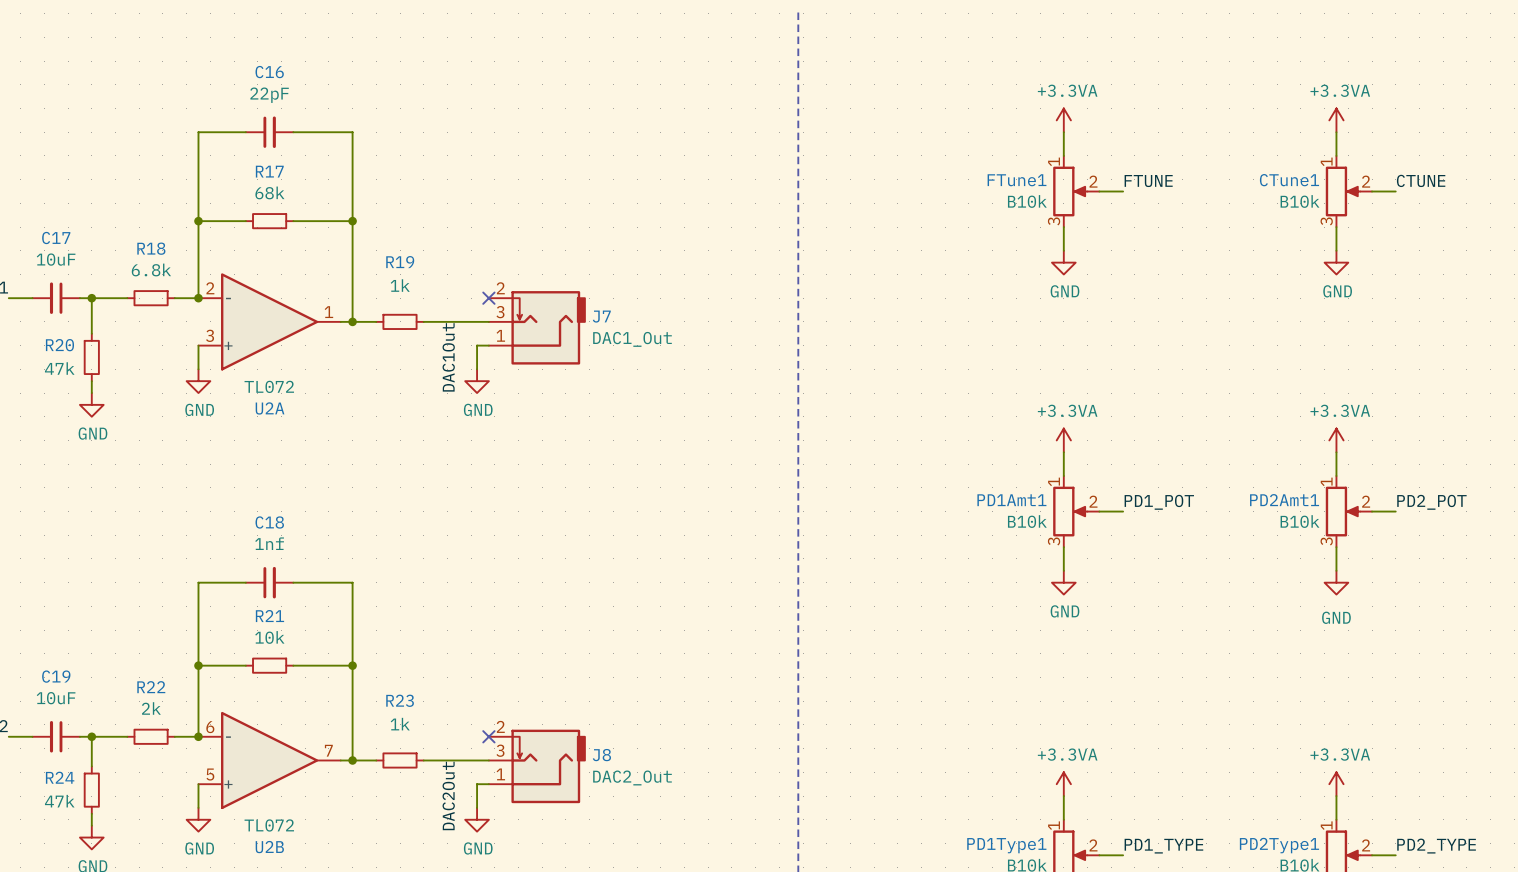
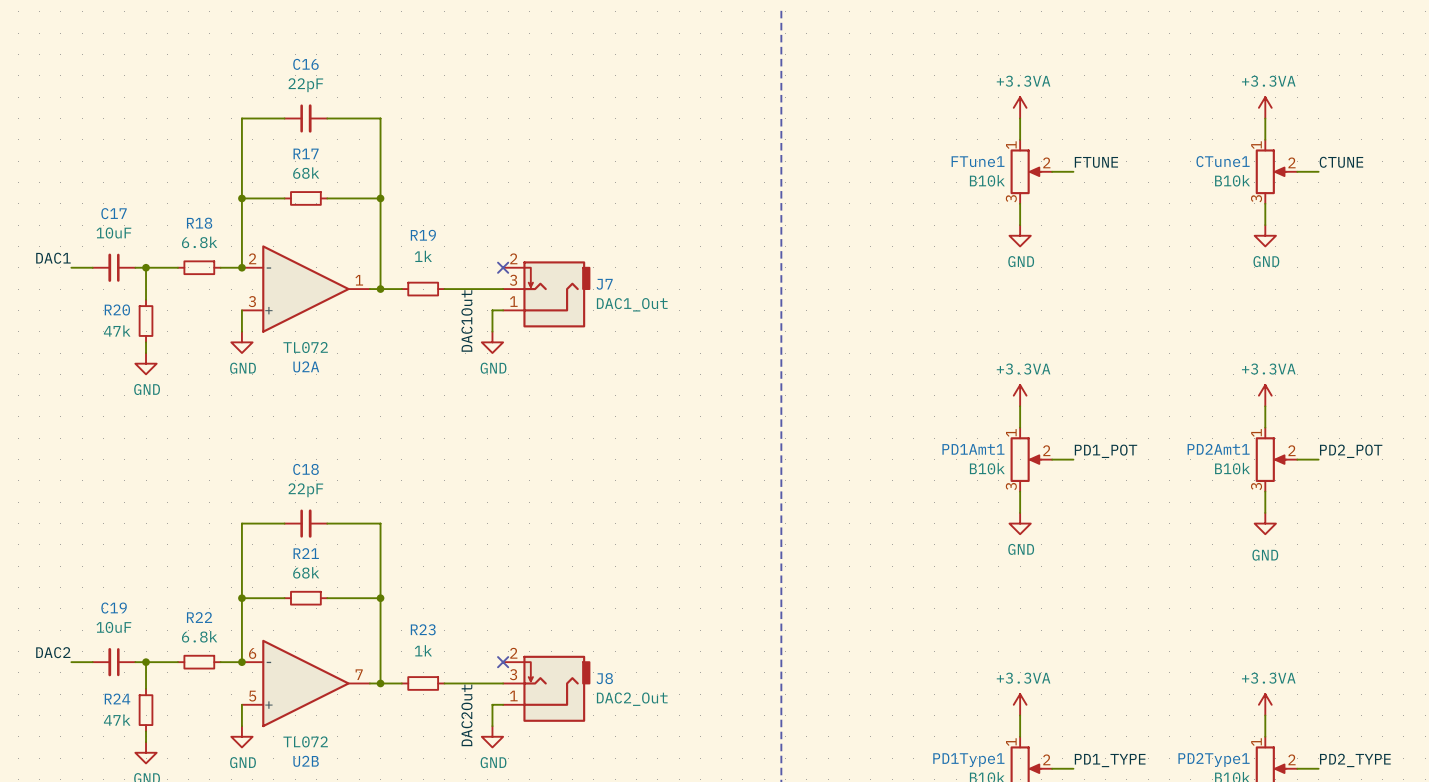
C18 value: 1nf (269, 543) -> 22pF (305, 490)
R21 value: 10k (269, 637) -> 68k (306, 572)
R22 value: 2k (151, 708) -> 6.8k (199, 636)

